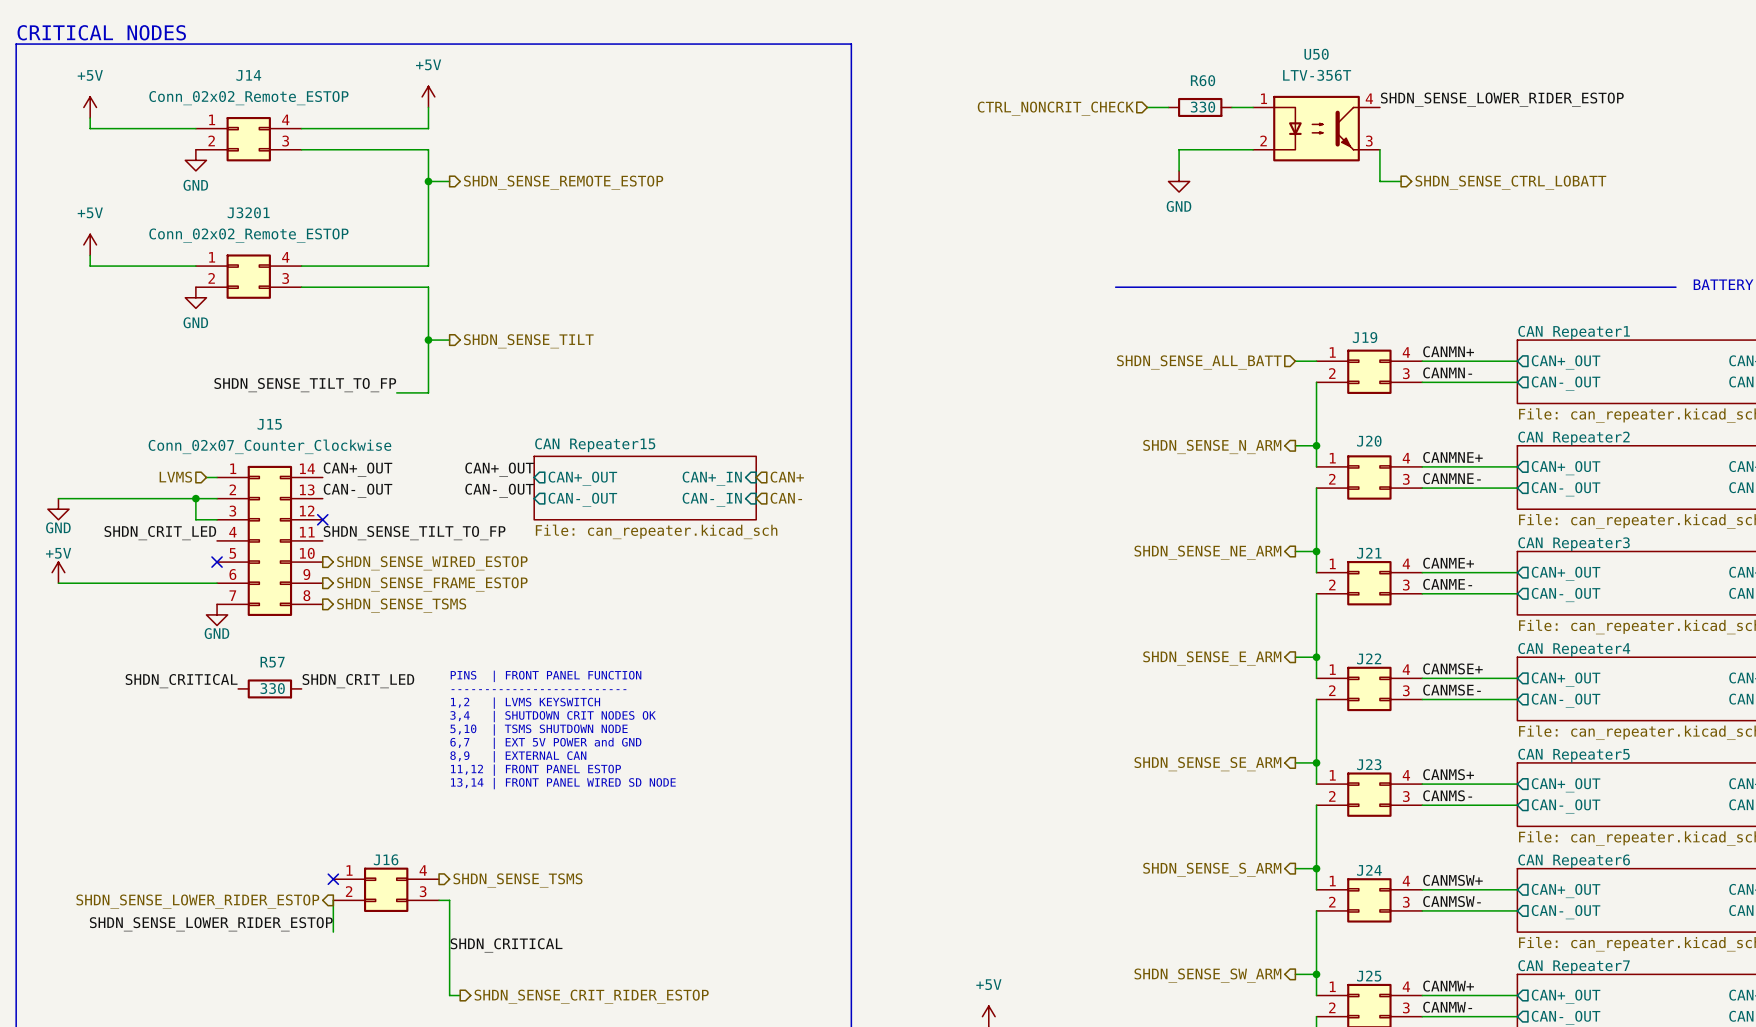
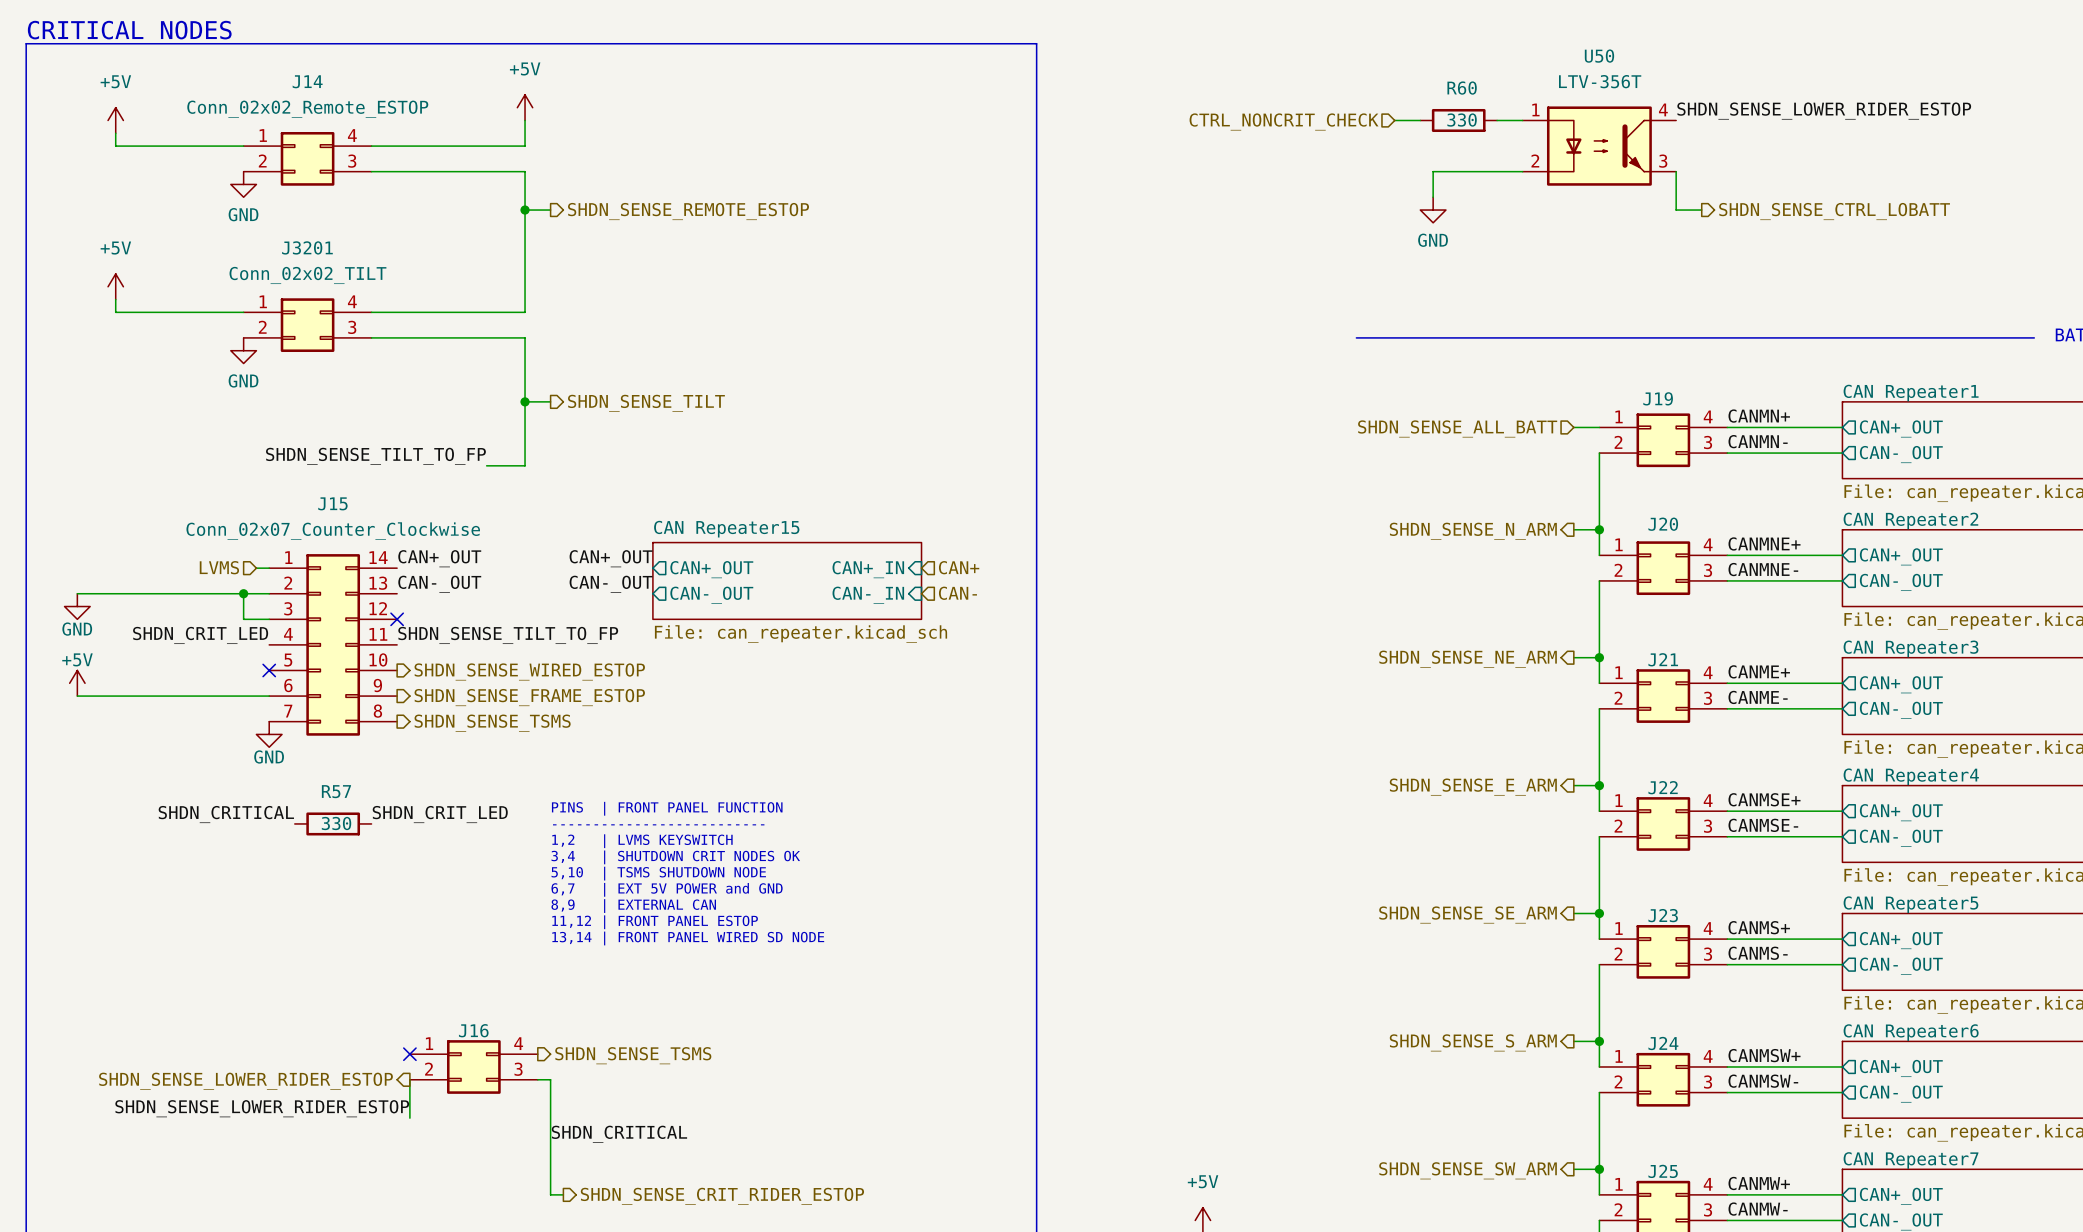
J3201 value: Conn_02x02_Remote_ESTOP (248, 235) -> Conn_02x02_TILT (307, 275)

